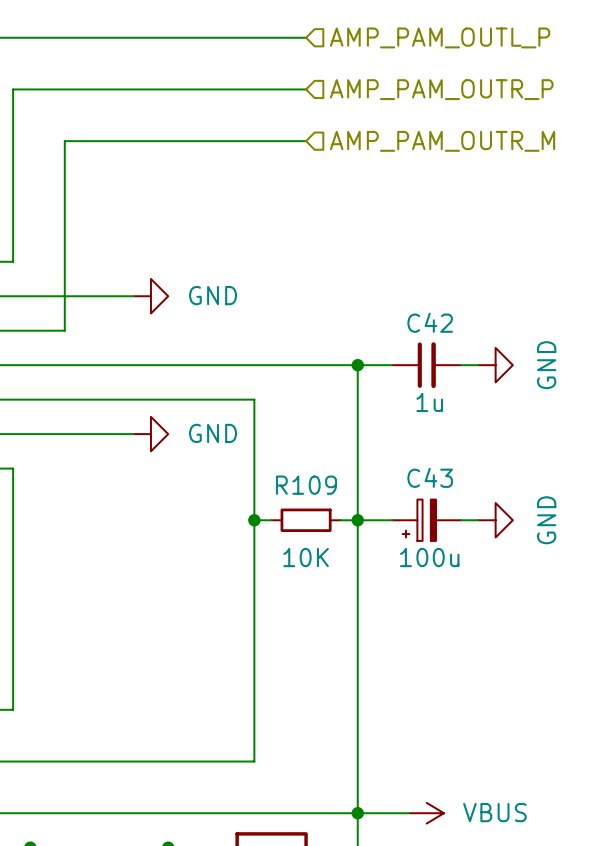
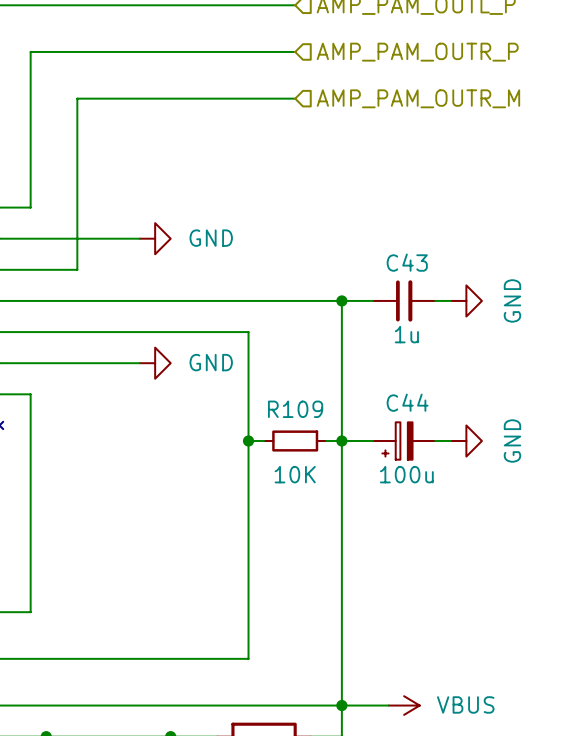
C42 name: C42 (430, 322) -> C43 (407, 262)
C43 name: C43 (430, 477) -> C44 (407, 402)

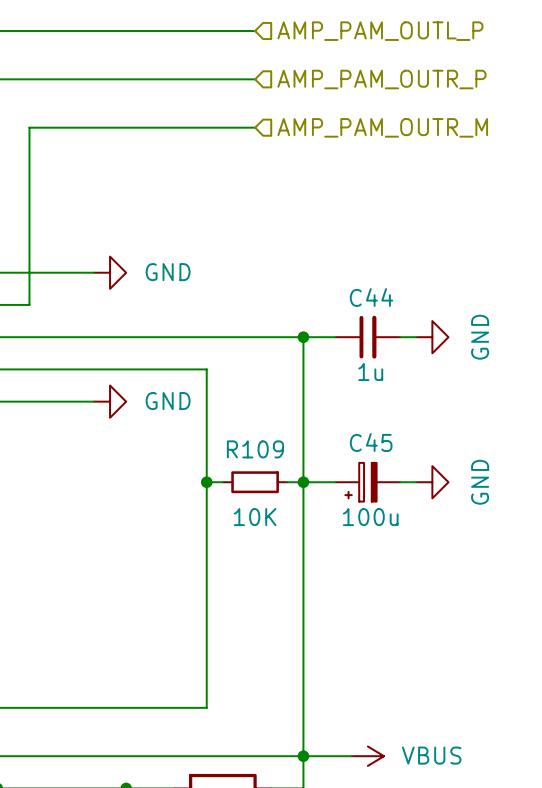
C43 name: C43 (407, 262) -> C44 (371, 297)
C44 name: C44 (407, 402) -> C45 (371, 442)

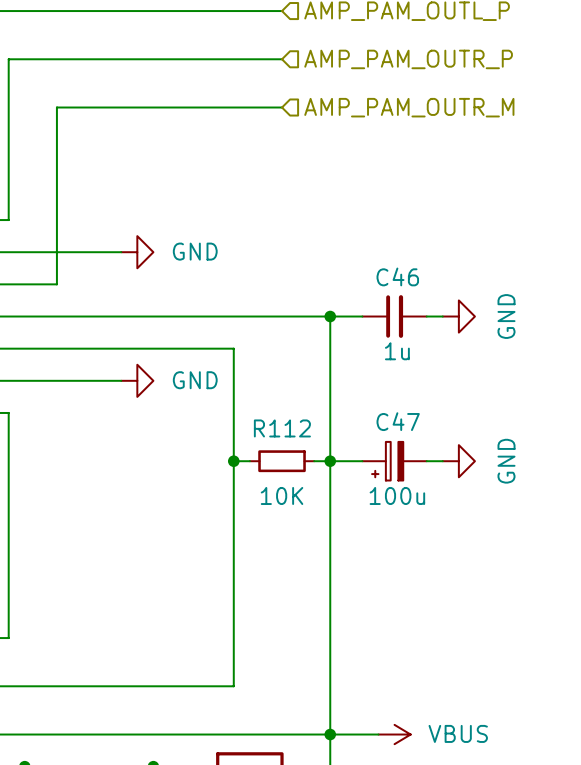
C44 name: C44 (371, 297) -> C46 (397, 276)
C45 name: C45 (371, 442) -> C47 (398, 421)
R109 name: R109 (255, 449) -> R112 (282, 428)

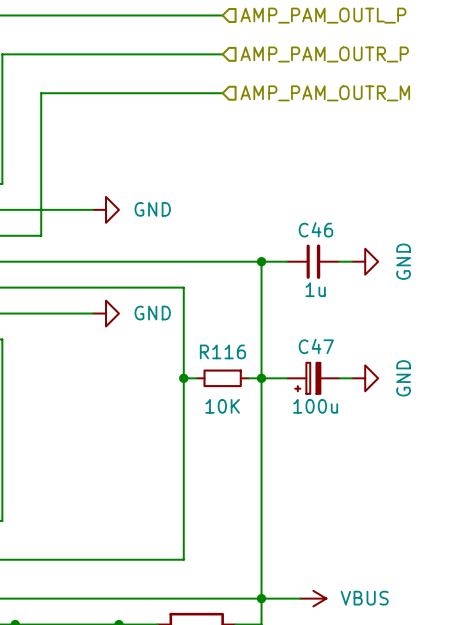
R112 name: R112 (282, 428) -> R116 (222, 351)

